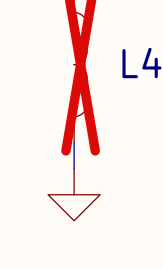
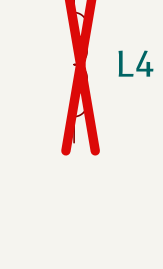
wire: (74, 142) (74, 168) -> none
power symbol: (74, 194) -> none

